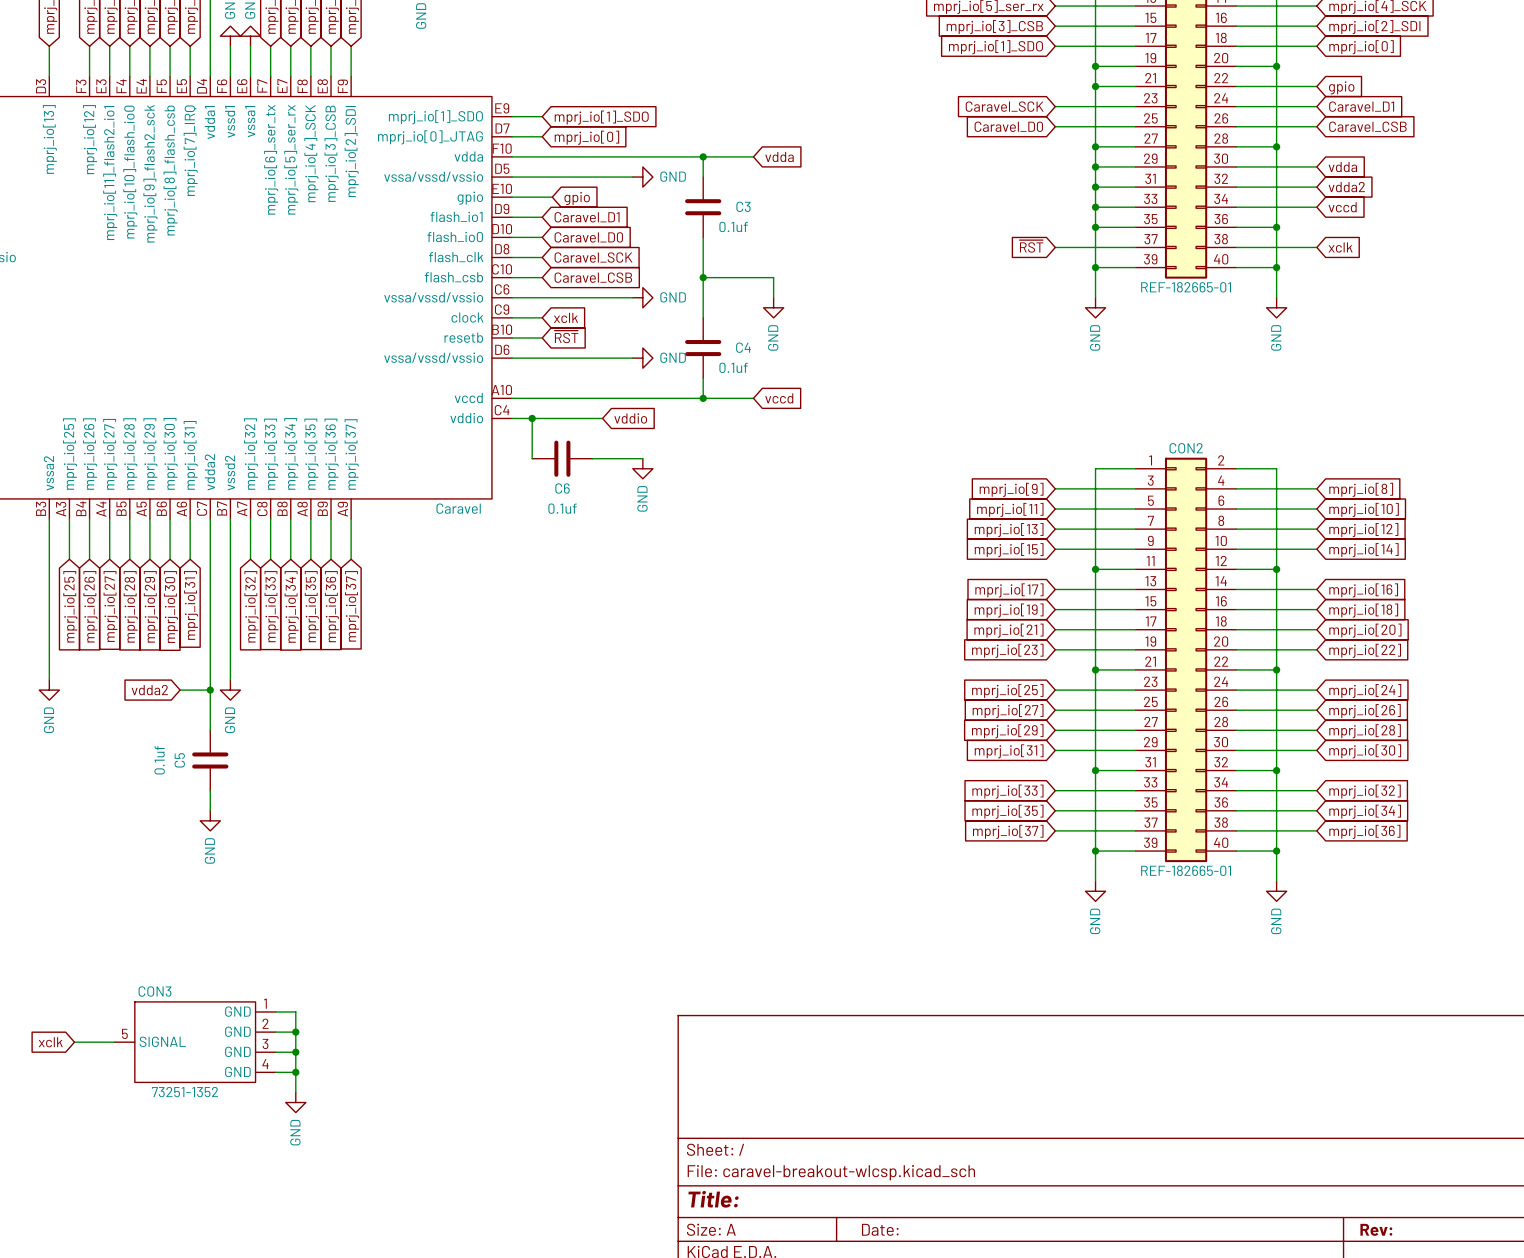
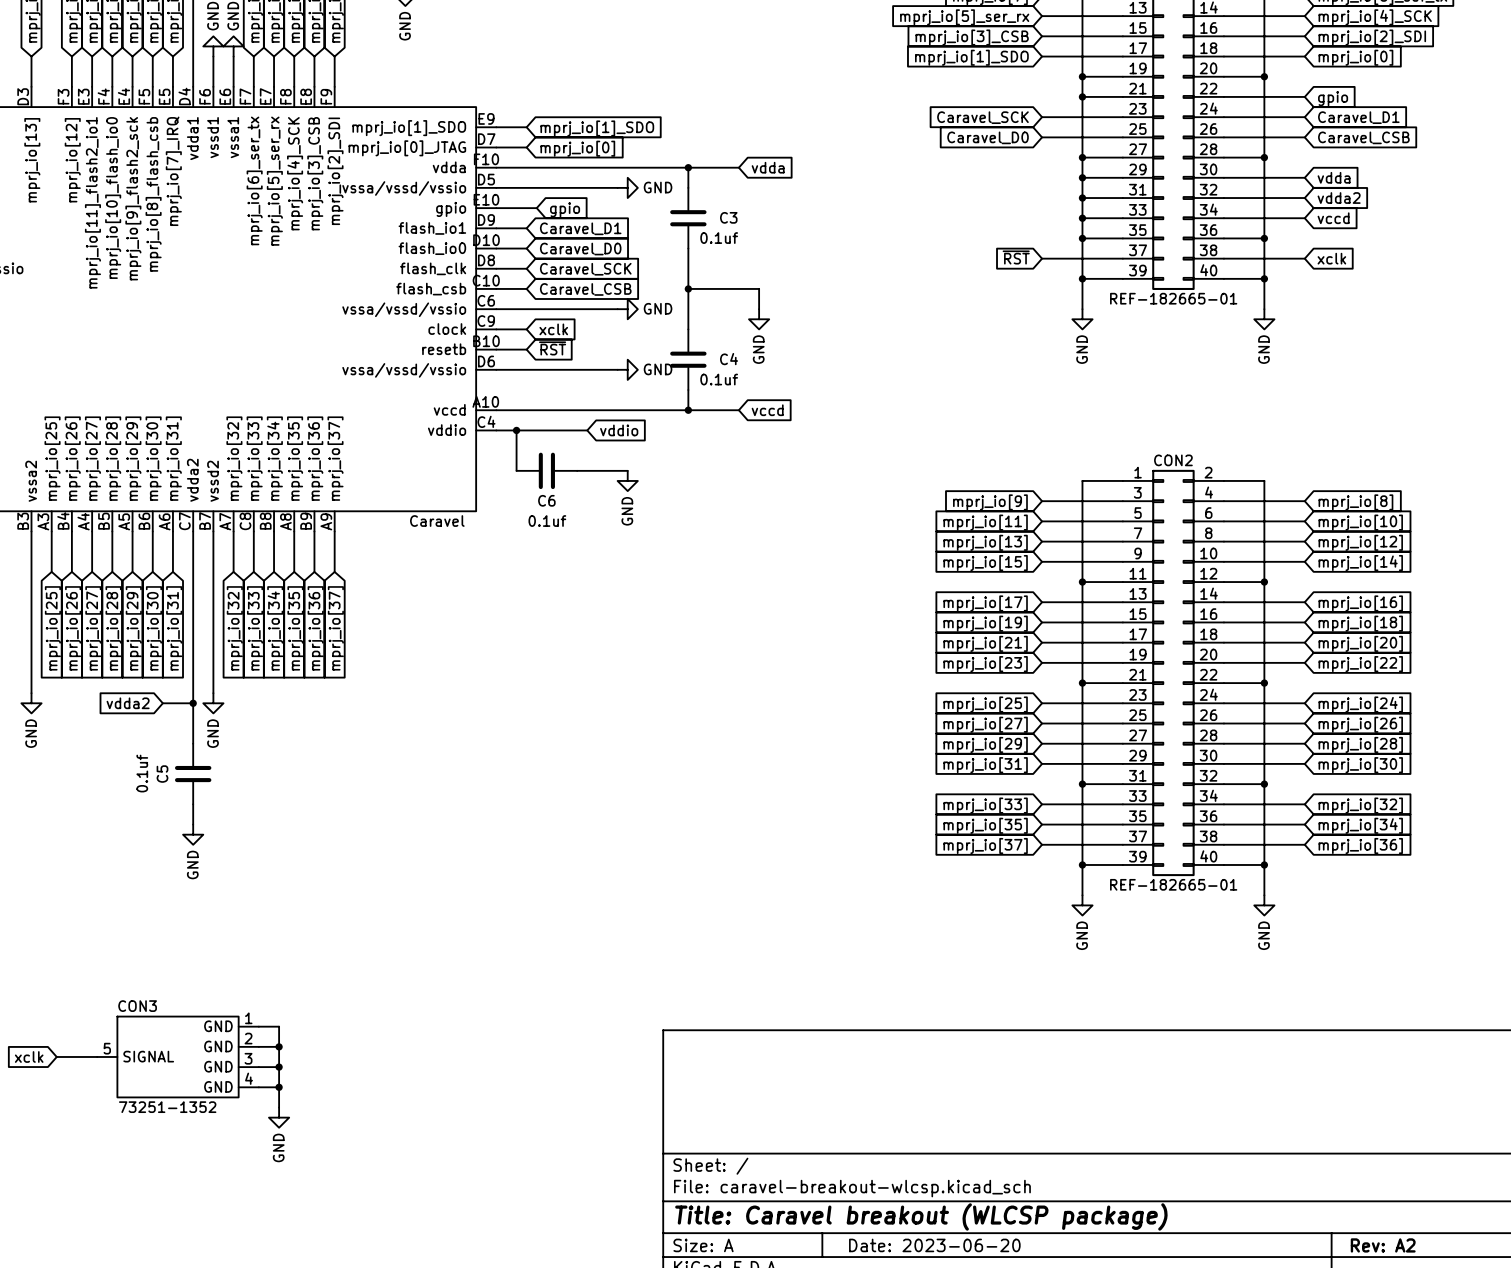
title block: Title: (713, 1199) -> Title: Caravel breakout (WLCSP package) (921, 1216)
title block: Date: (880, 1229) -> Date: 2023-06-20 (934, 1245)
title block: Rev: (1376, 1229) -> Rev: A2 (1383, 1245)

